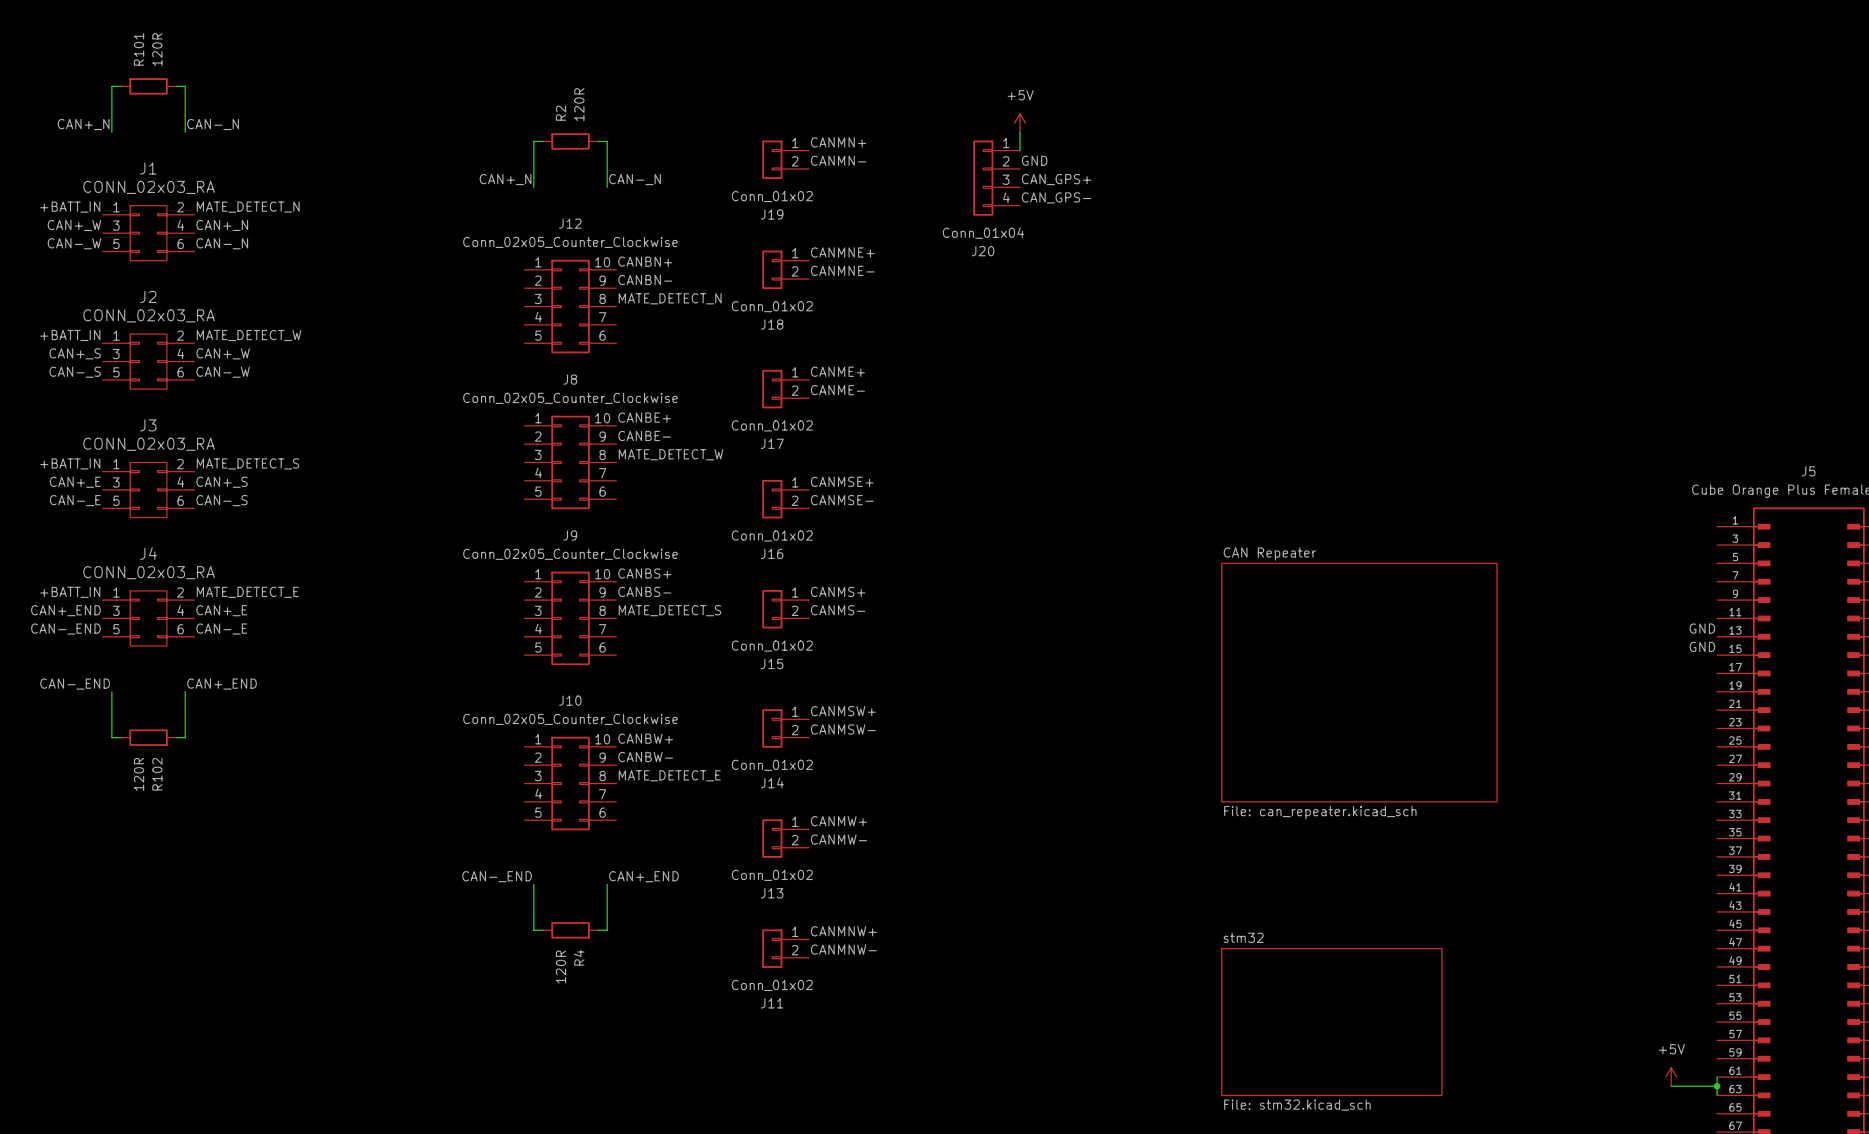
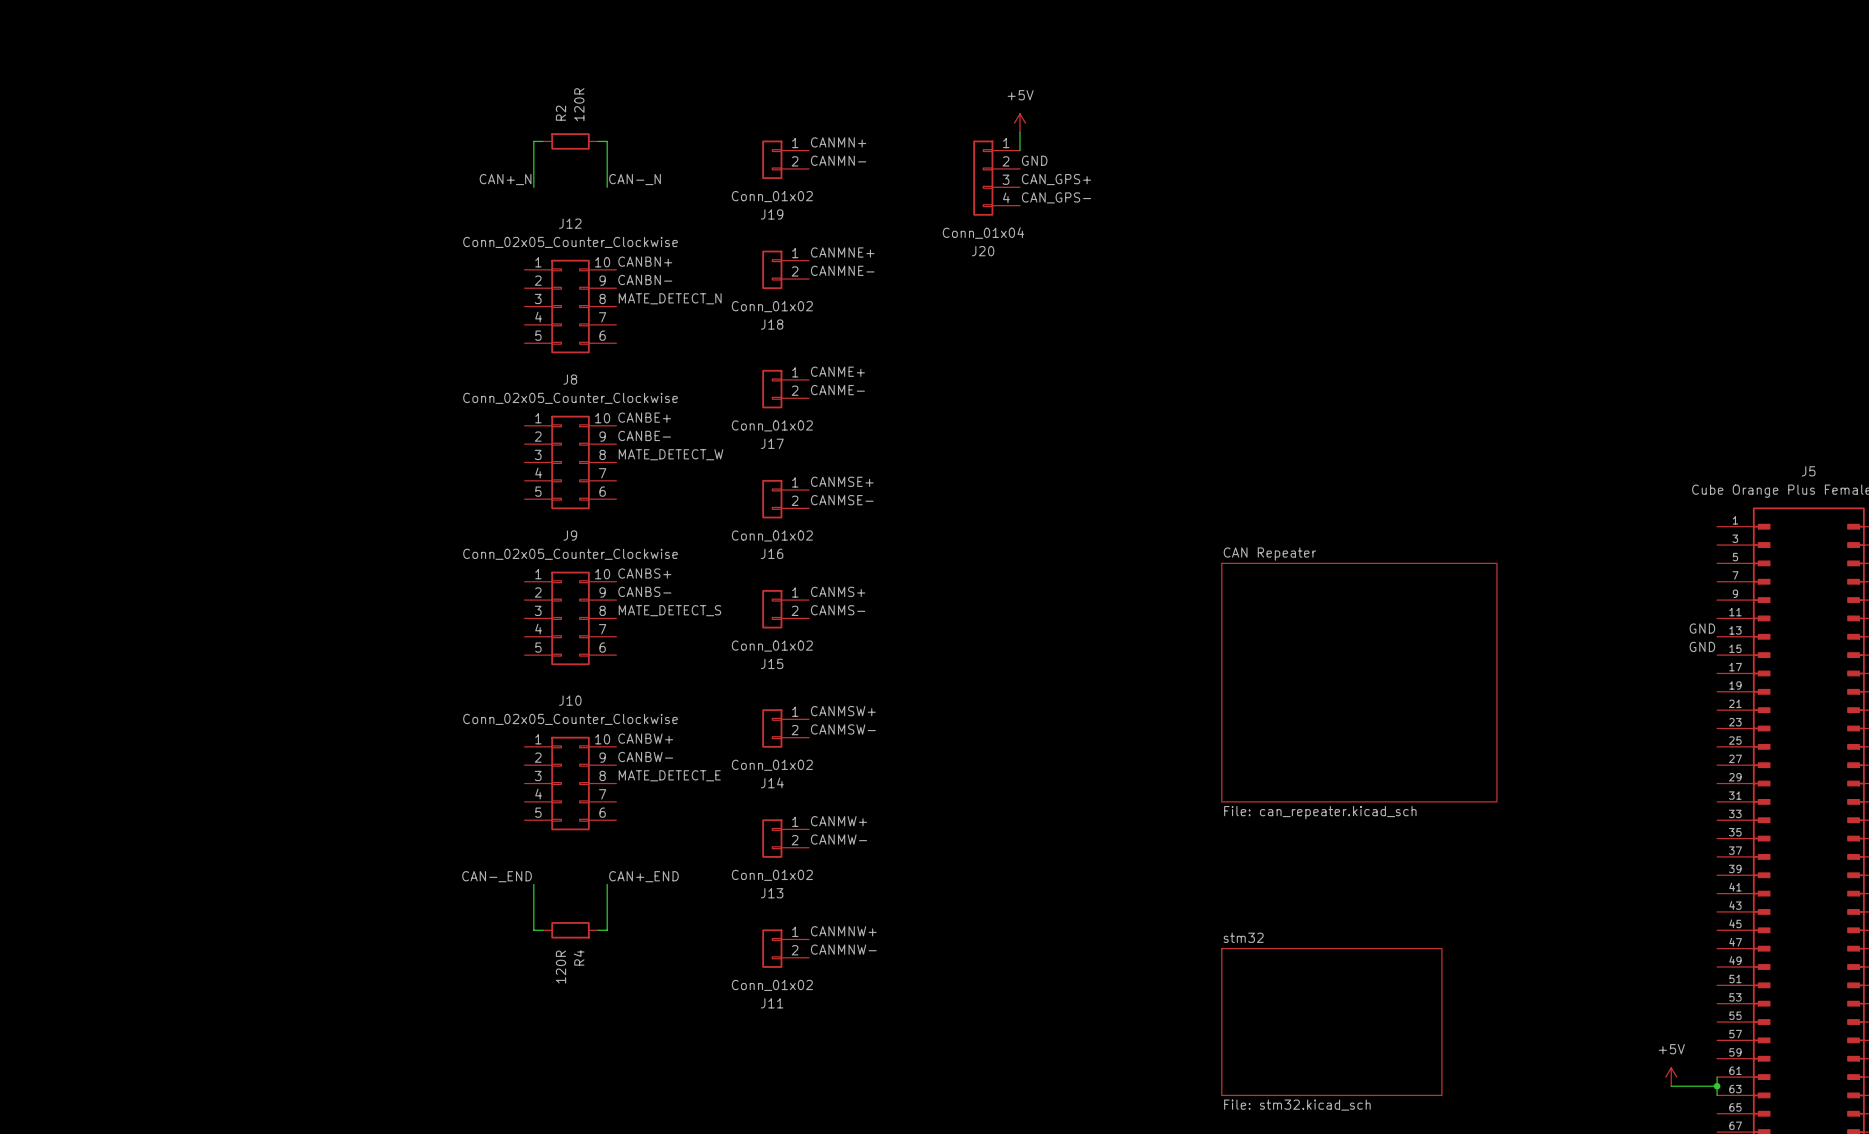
wire: (121, 86) (111, 86) (111, 132) -> none
R101: 120R (148, 86) -> none
wire: (176, 86) (185, 86) (185, 132) -> none
label: CAN+_N (83, 124) -> none
label: CAN-_N (213, 124) -> none
label: +BATT_IN (70, 207) -> none
label: MATE_DETECT_N (248, 207) -> none
label: CAN+_W (74, 225) -> none
label: CAN+_N (222, 225) -> none
J1: CONN_02x03_RA (148, 233) -> none
label: CAN-_W (74, 243) -> none
label: CAN-_N (222, 243) -> none
label: +BATT_IN (70, 335) -> none
label: MATE_DETECT_W (249, 335) -> none
label: CAN+_S (75, 353) -> none
label: CAN+_W (223, 353) -> none
J2: CONN_02x03_RA (148, 361) -> none
label: CAN-_S (75, 372) -> none
label: CAN-_W (223, 372) -> none
label: +BATT_IN (70, 463) -> none
label: MATE_DETECT_S (248, 463) -> none
label: CAN+_E (75, 482) -> none
label: CAN+_S (222, 482) -> none
J3: CONN_02x03_RA (148, 490) -> none
label: CAN-_E (75, 500) -> none
label: CAN-_S (222, 500) -> none
label: +BATT_IN (70, 592) -> none
label: MATE_DETECT_E (247, 592) -> none
label: CAN+_END (65, 610) -> none
label: CAN+_E (221, 610) -> none
J4: CONN_02x03_RA (148, 618) -> none
label: CAN-_END (65, 629) -> none
label: CAN-_E (221, 629) -> none
label: CAN-_END (75, 684) -> none
label: CAN+_END (222, 684) -> none
wire: (111, 691) (111, 737) (121, 737) -> none
wire: (185, 691) (185, 737) (176, 737) -> none
R102: 120R (148, 737) -> none

